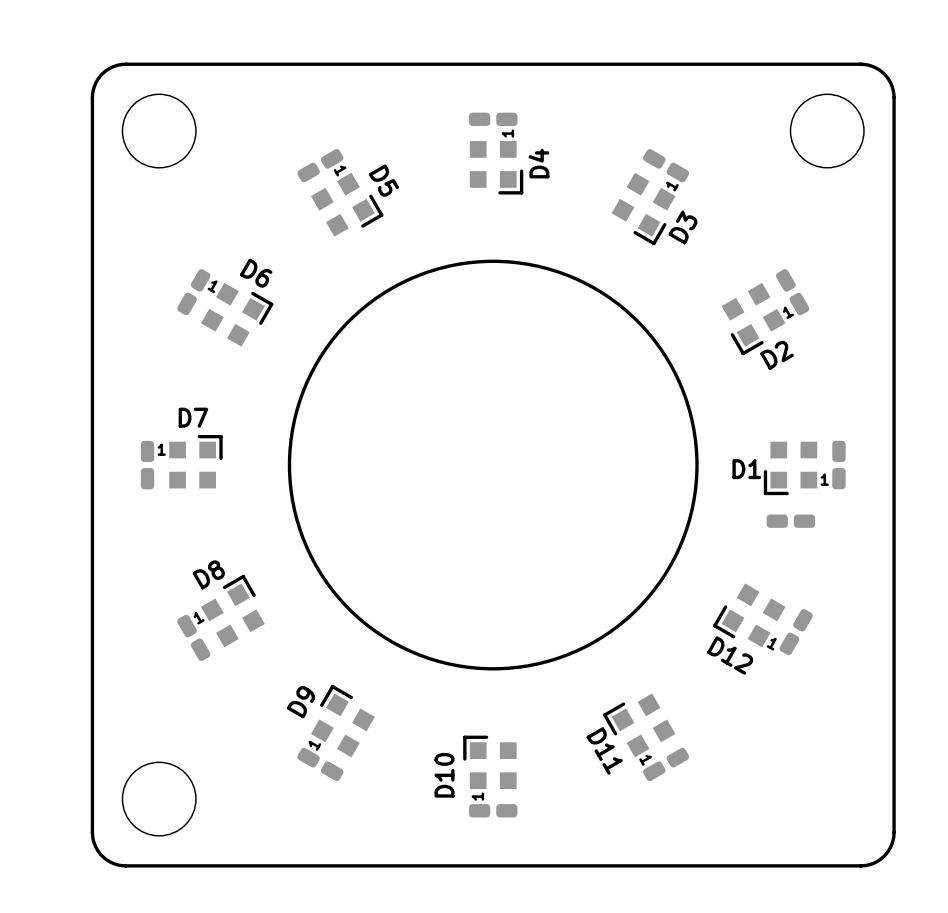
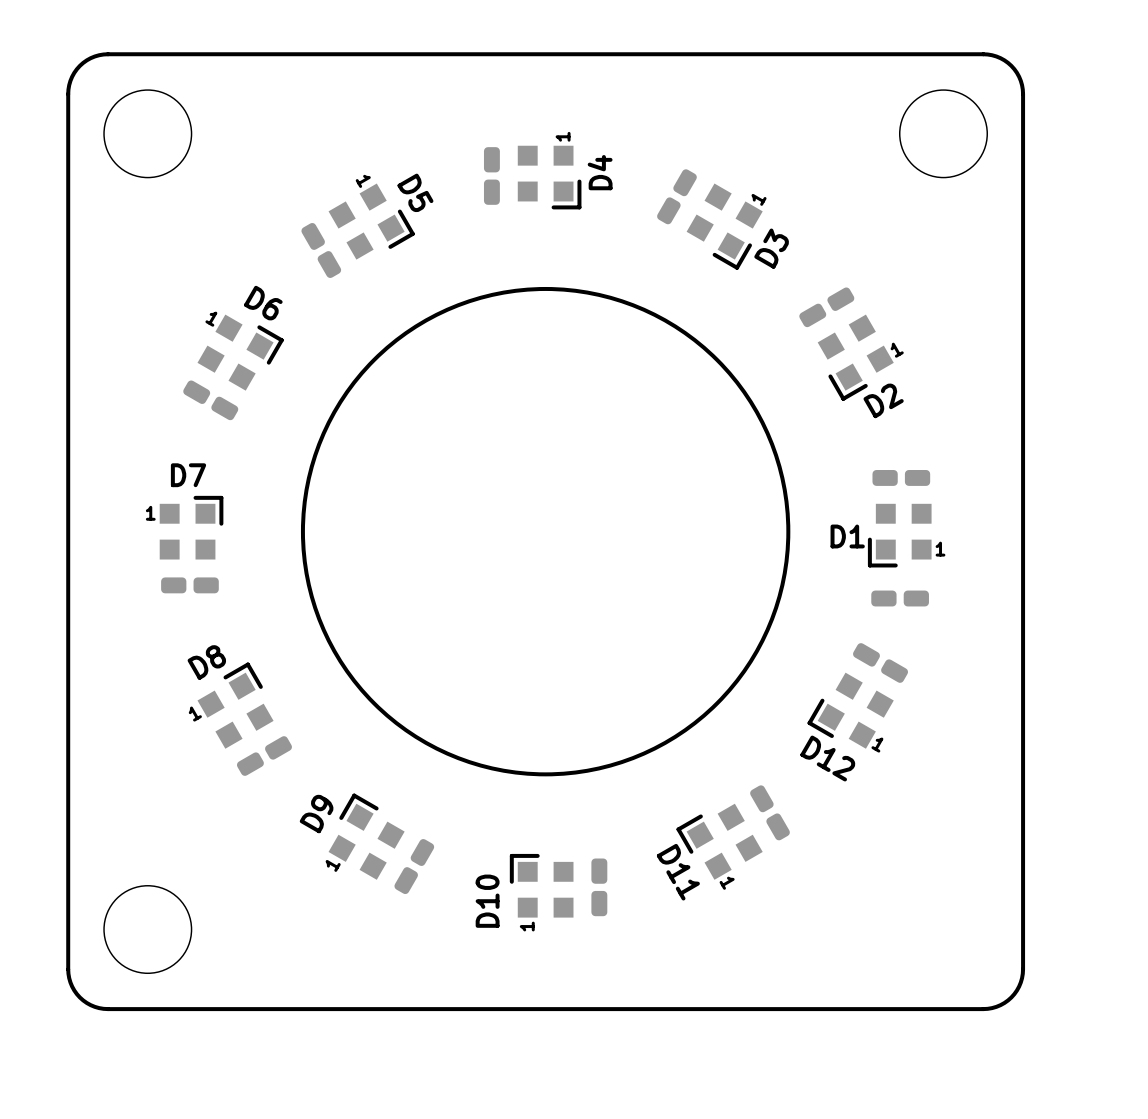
part rotation: 0° (493, 119) -> 90° clockwise (491, 175)
part position: (493, 119) -> (491, 175)
part rotation: 0° (320, 165) -> 90° clockwise (321, 250)
part position: (320, 165) -> (321, 250)
part rotation: 0° (666, 165) -> 90° clockwise (676, 196)
part position: (666, 165) -> (676, 196)
part rotation: 0° (193, 292) -> 90° clockwise (210, 400)
part position: (193, 292) -> (210, 400)
part rotation: 0° (792, 292) -> 90° clockwise (826, 307)
part position: (792, 292) -> (826, 307)
part rotation: 0° (147, 465) -> 90° clockwise (189, 585)
part position: (147, 465) -> (189, 585)
part rotation: 0° (838, 465) -> 90° clockwise (901, 477)
part position: (838, 465) -> (901, 477)
part rotation: 0° (796, 632) -> 90° clockwise (880, 662)
part position: (796, 632) -> (880, 662)
part rotation: 0° (193, 637) -> 90° clockwise (264, 756)
part position: (193, 637) -> (264, 756)
part rotation: 0° (320, 764) -> 90° clockwise (414, 866)
part position: (320, 764) -> (414, 866)
part rotation: 0° (666, 764) -> 90° clockwise (769, 812)
part position: (666, 764) -> (769, 812)
part rotation: 0° (493, 810) -> 90° clockwise (599, 887)
part position: (493, 810) -> (599, 887)

